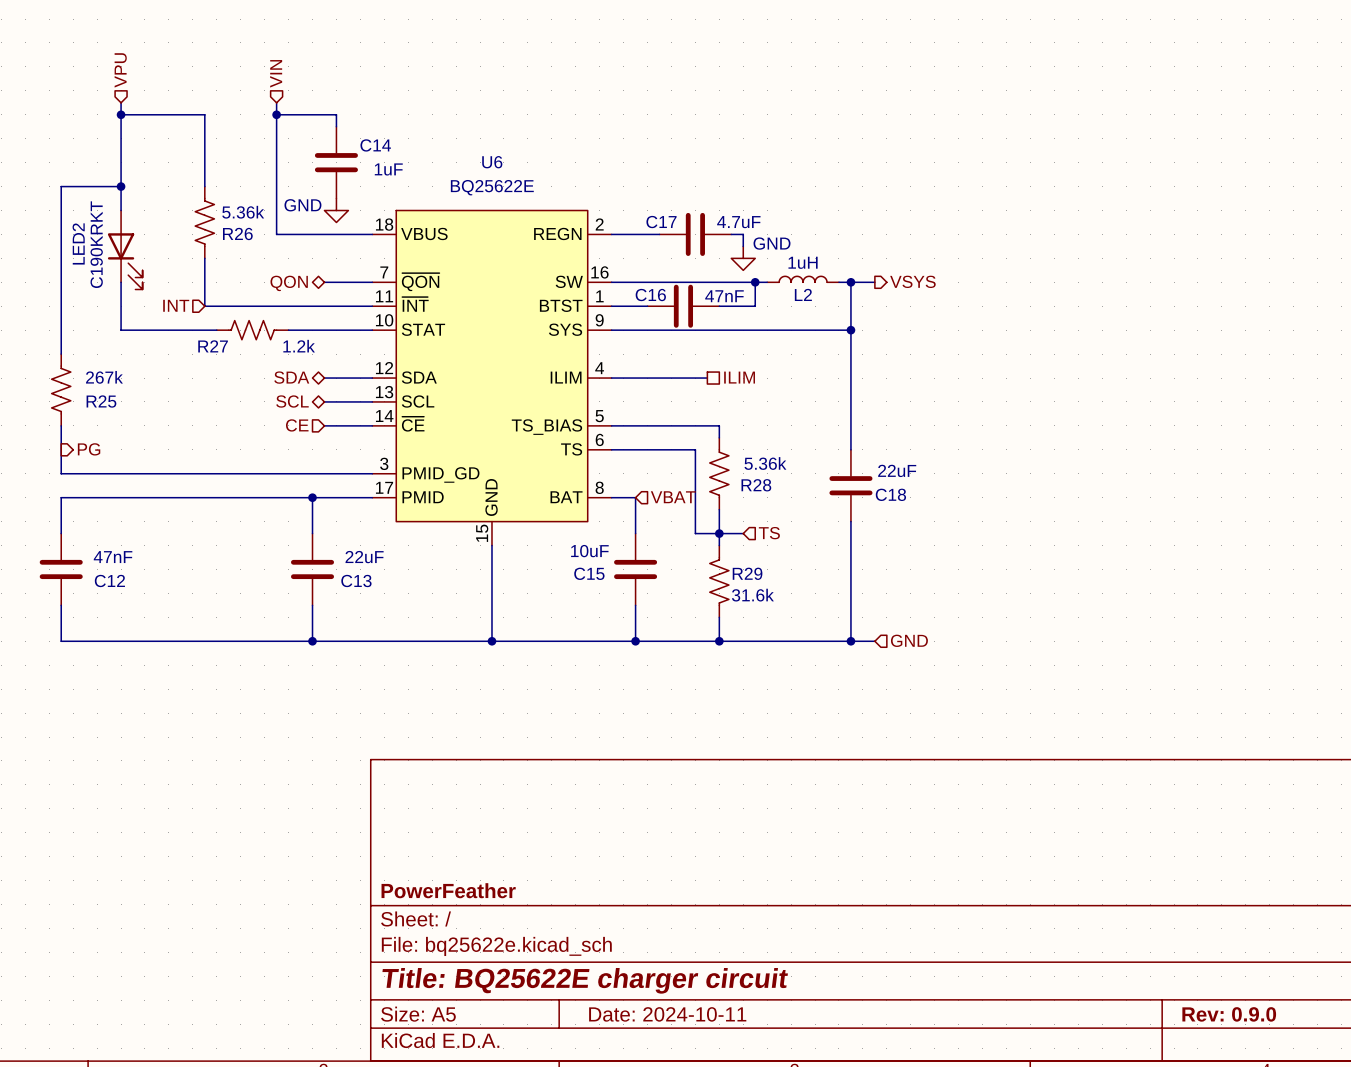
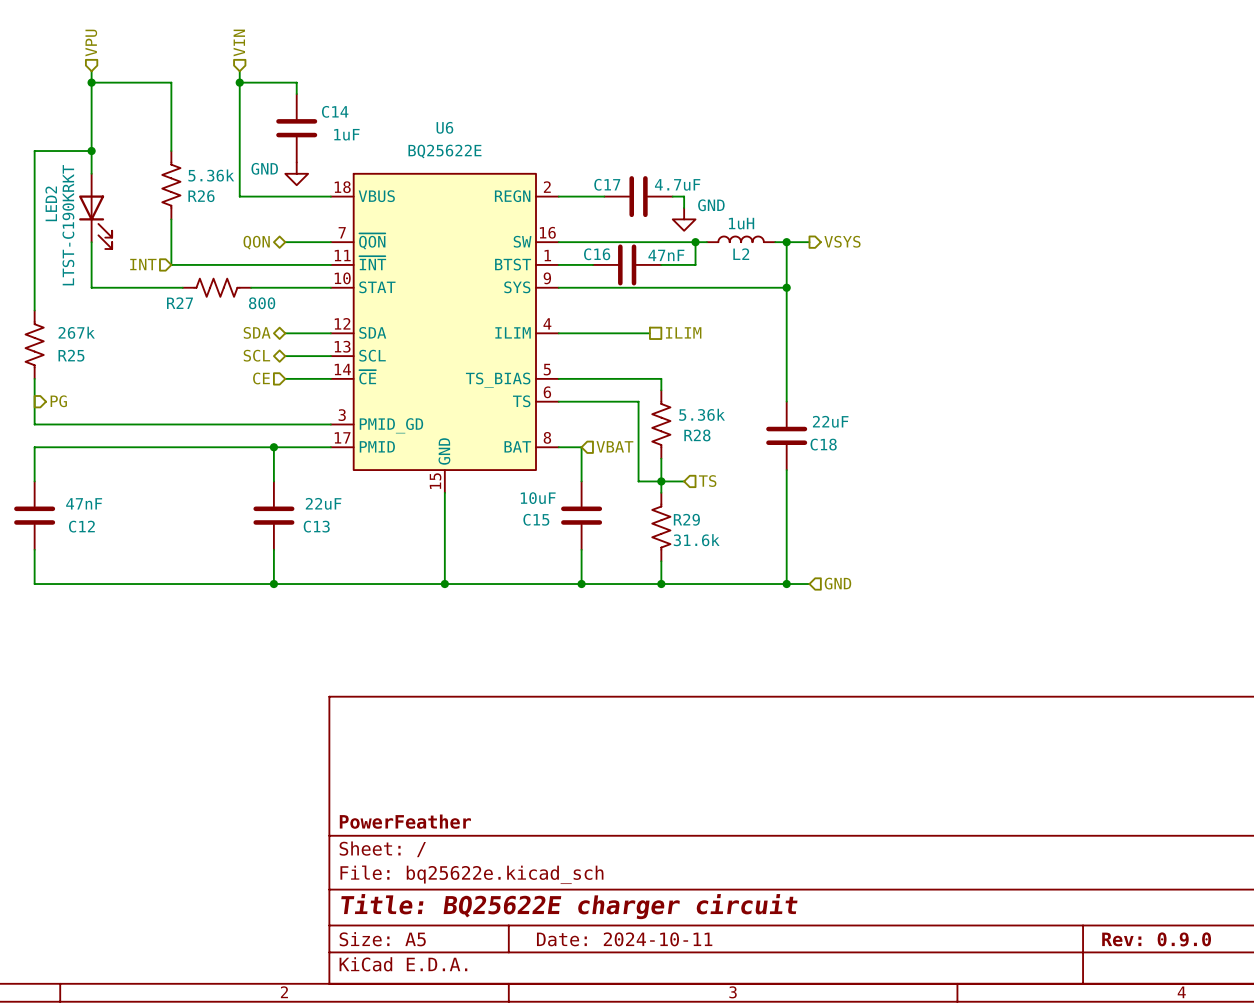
LED2 value: C190KRKT (96, 244) -> LTST-C190KRKT (68, 225)
R27 value: 1.2k (299, 346) -> 800 (262, 303)

